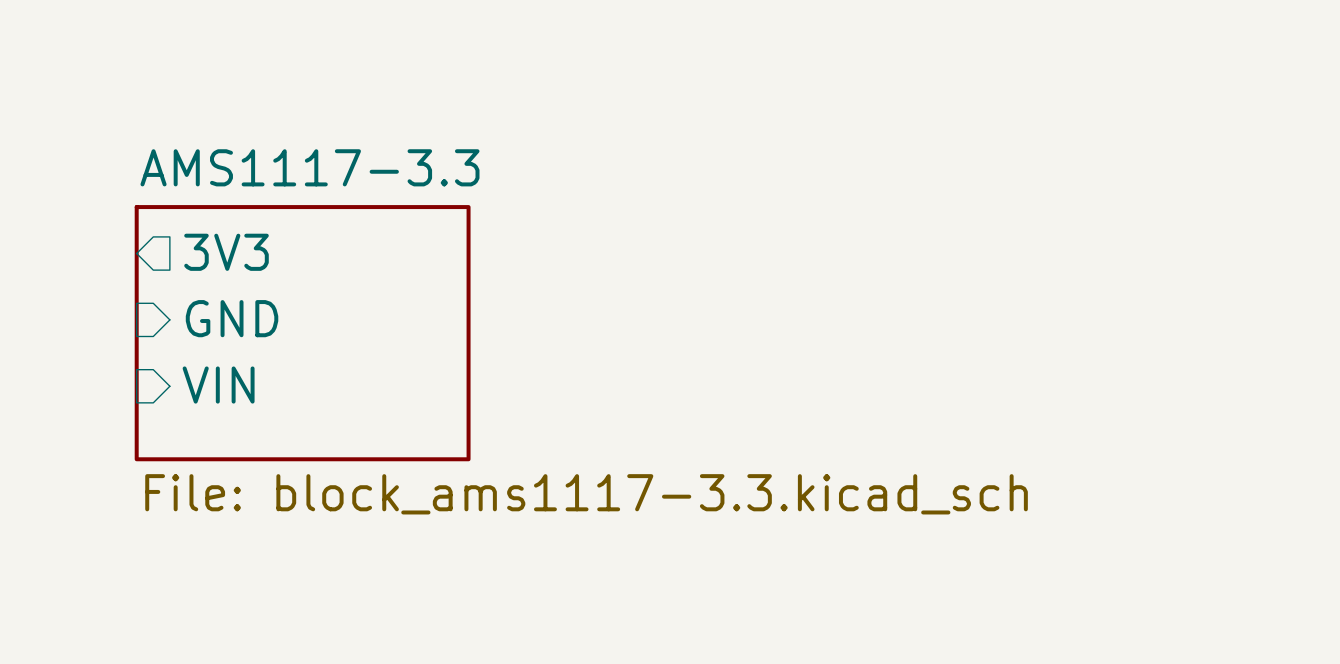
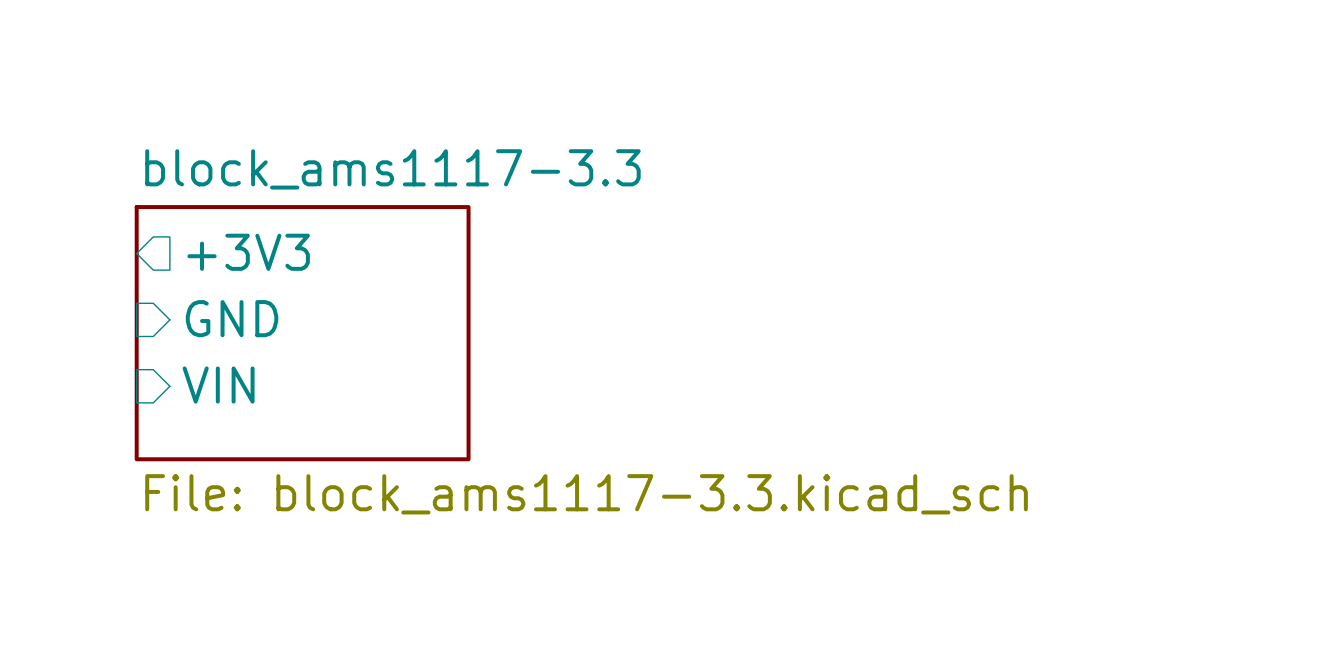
sheet AMS1117-3.3 name: AMS1117-3.3 (309, 167) -> block_ams1117-3.3 (392, 169)
sheet pin: 3V3 (226, 252) -> +3V3 (248, 252)

